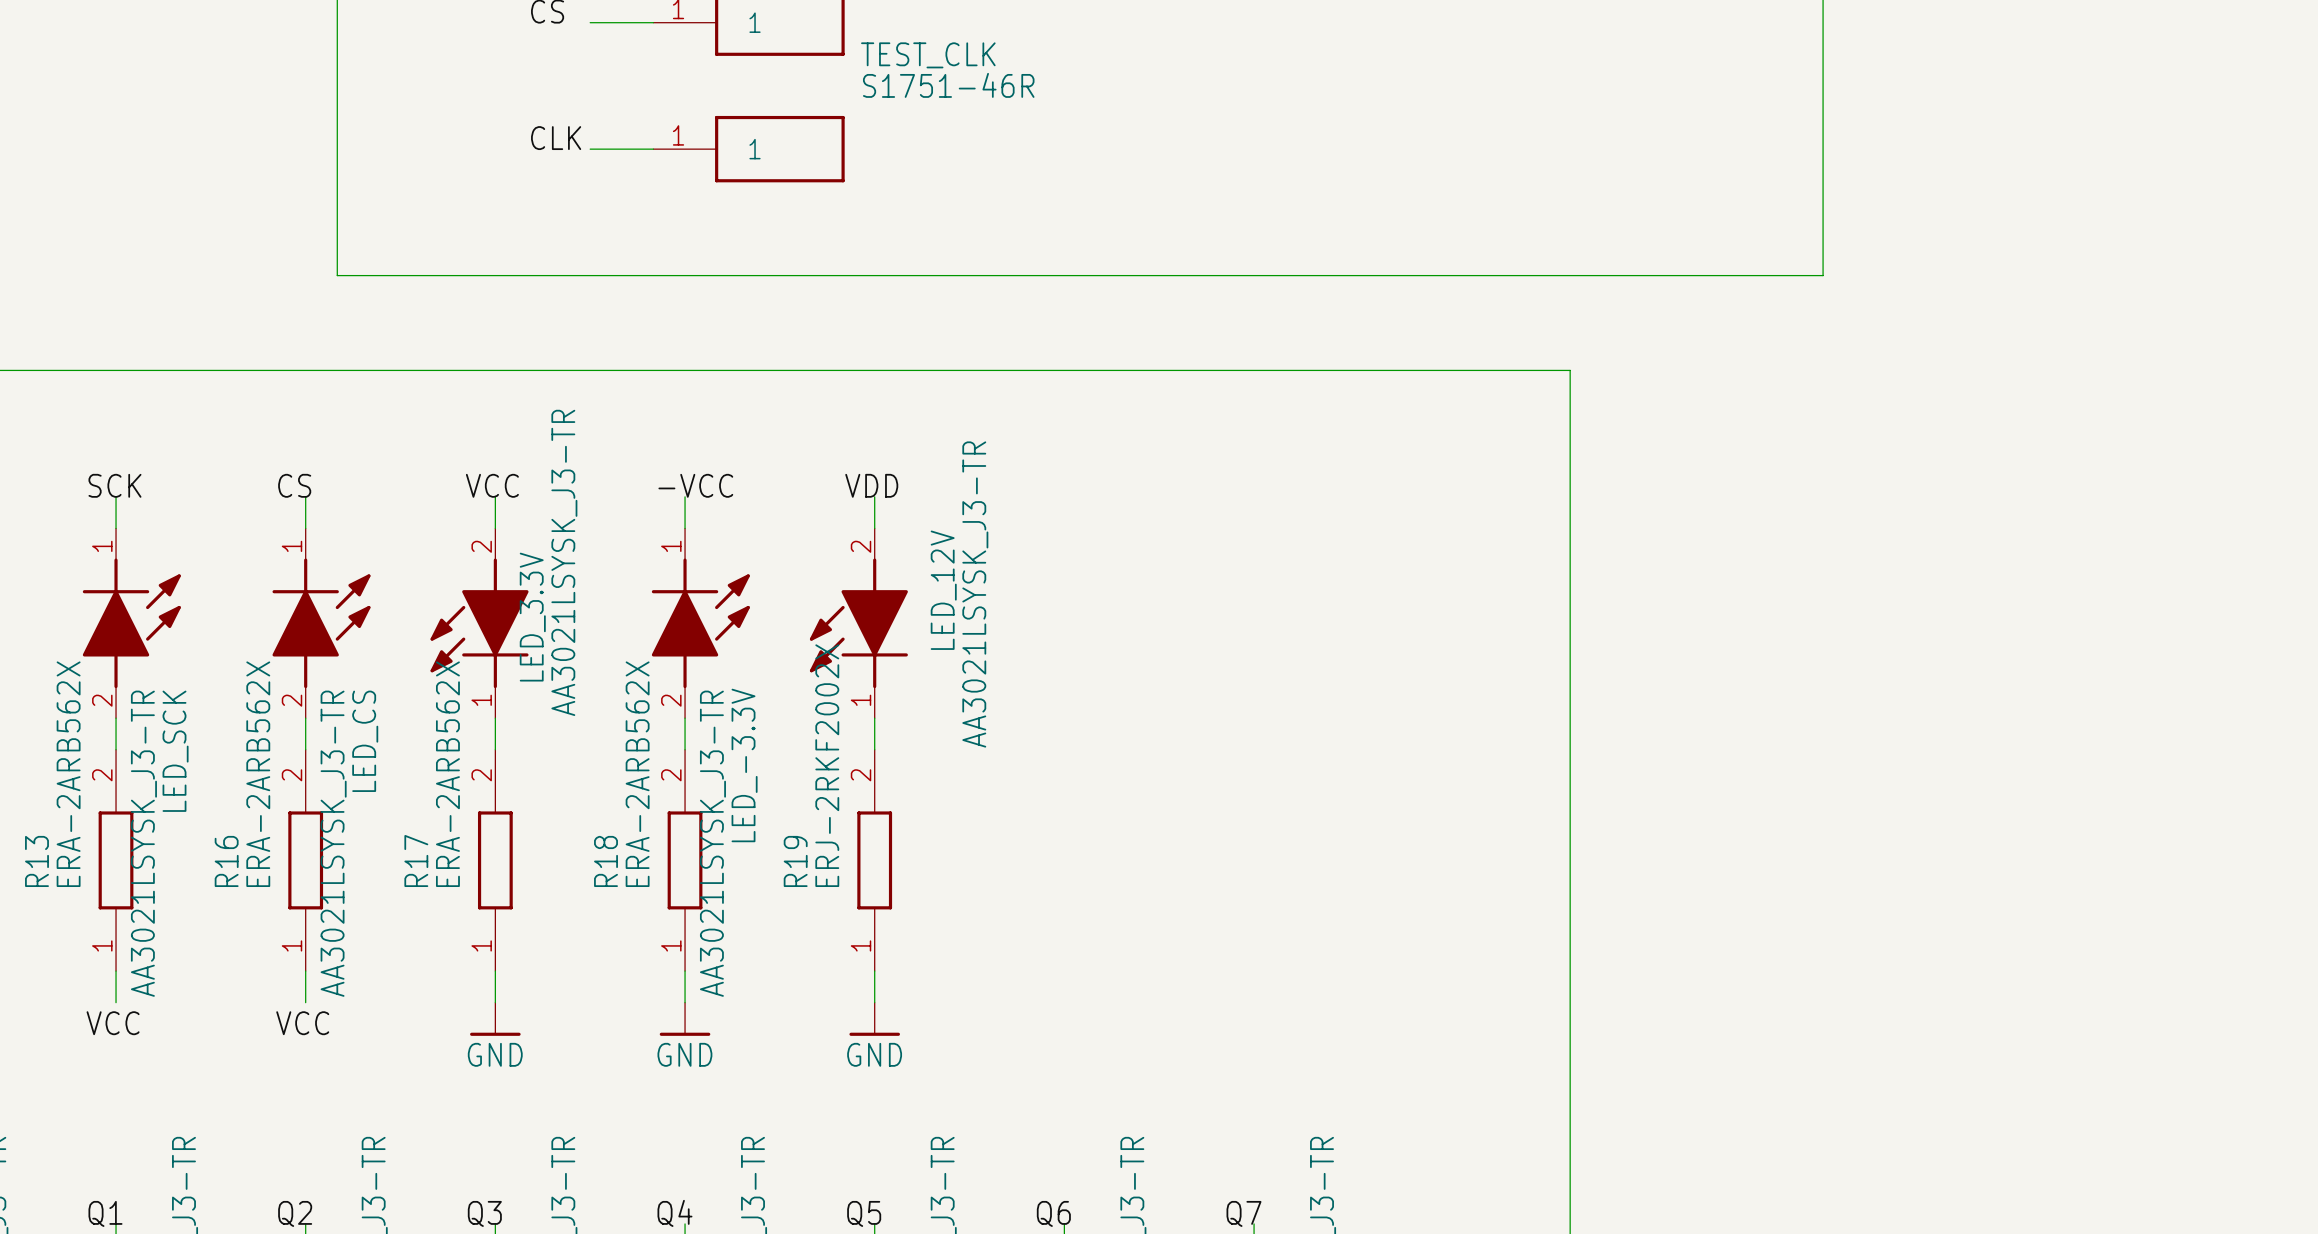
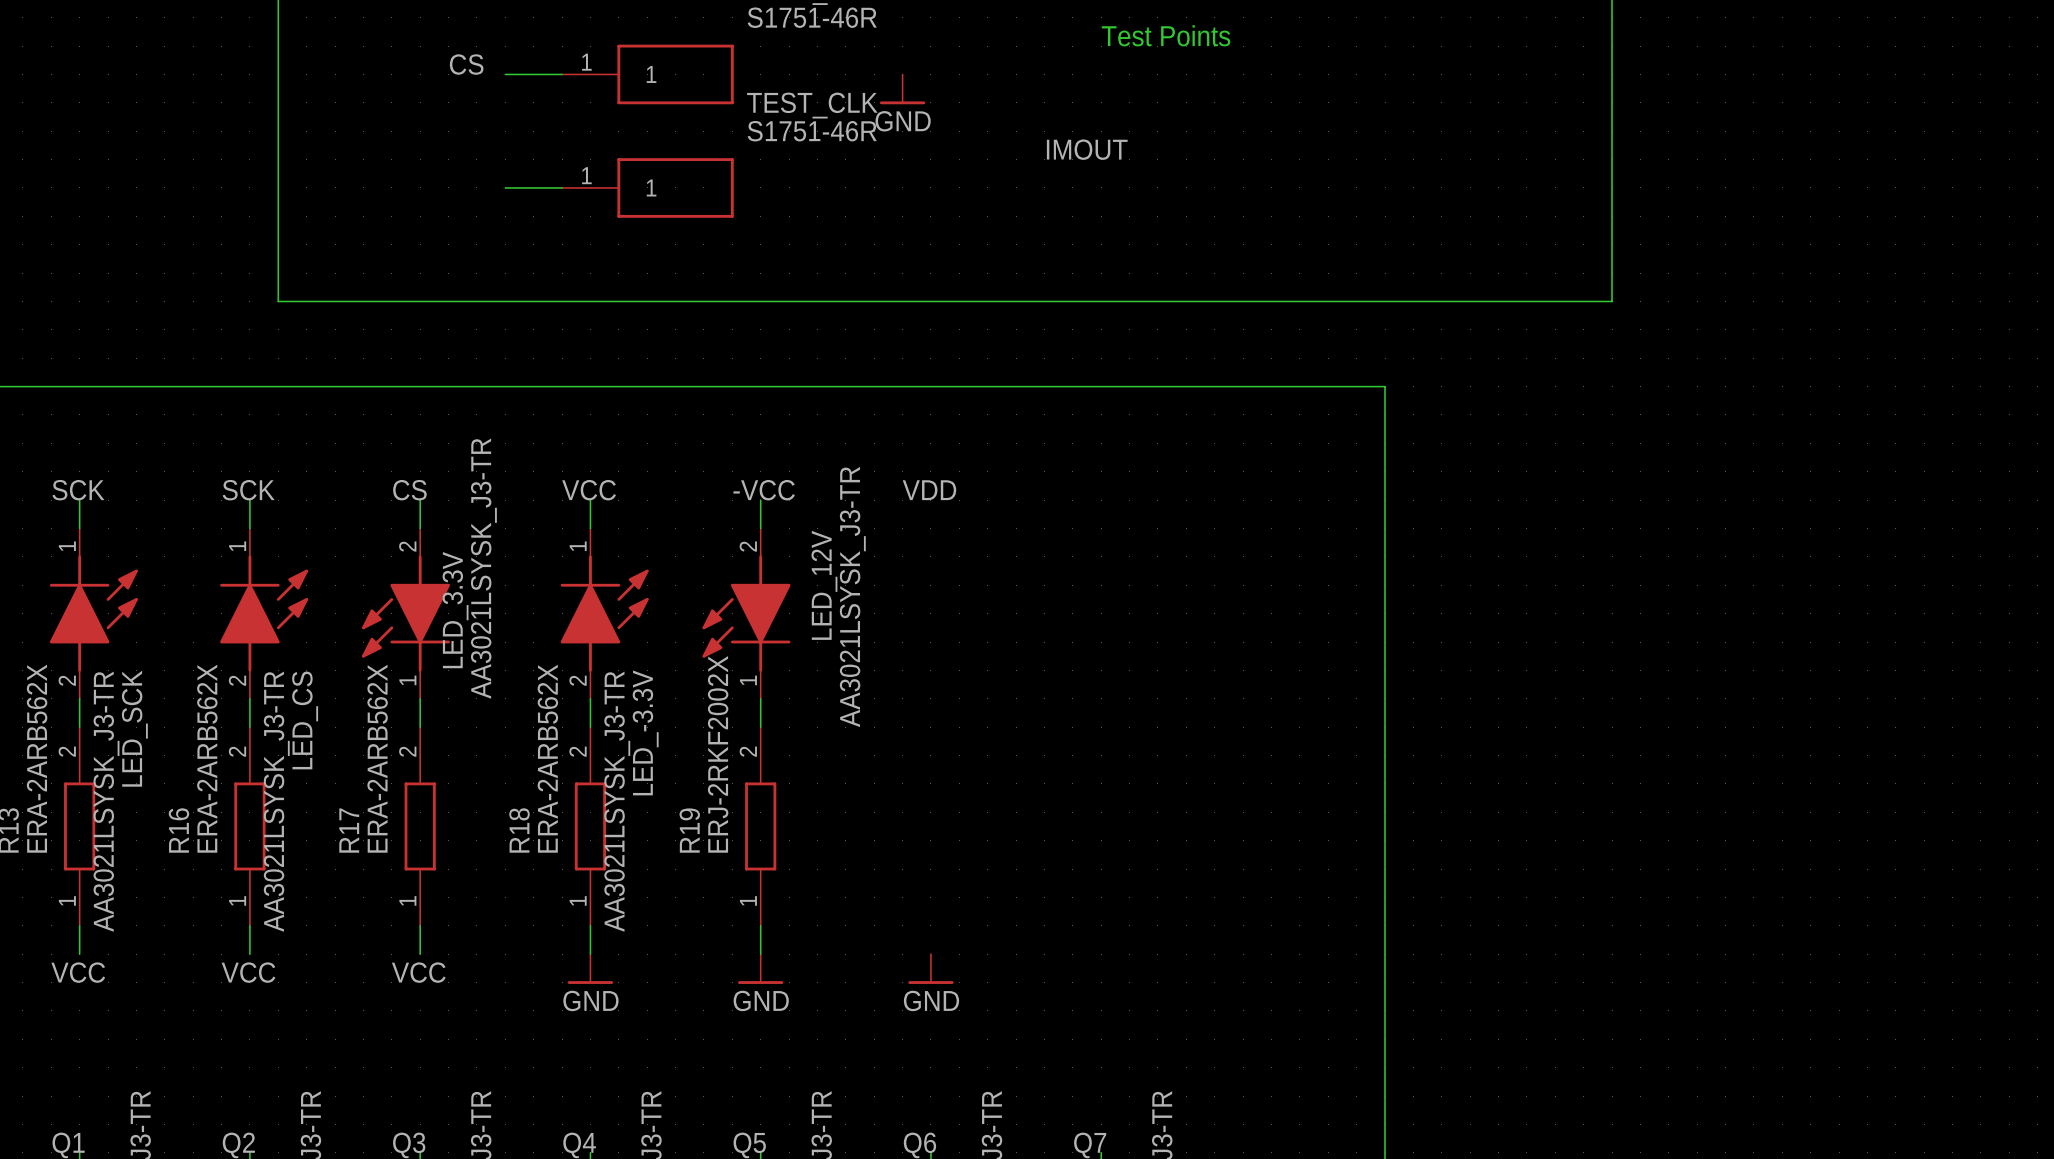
power symbol: none -> GND (902, 89)
label: none -> IMOUT (1087, 149)
label: CLK (556, 138) -> none
label: CS (294, 485) -> SCK (248, 490)
label: VCC (492, 485) -> CS (409, 490)
label: -VCC (695, 485) -> VCC (589, 490)
label: VDD (871, 485) -> -VCC (764, 490)
label: none -> VDD (929, 490)
power symbol: GND (495, 1019) -> none
power symbol: none -> GND (930, 969)
label: none -> VCC (418, 972)

